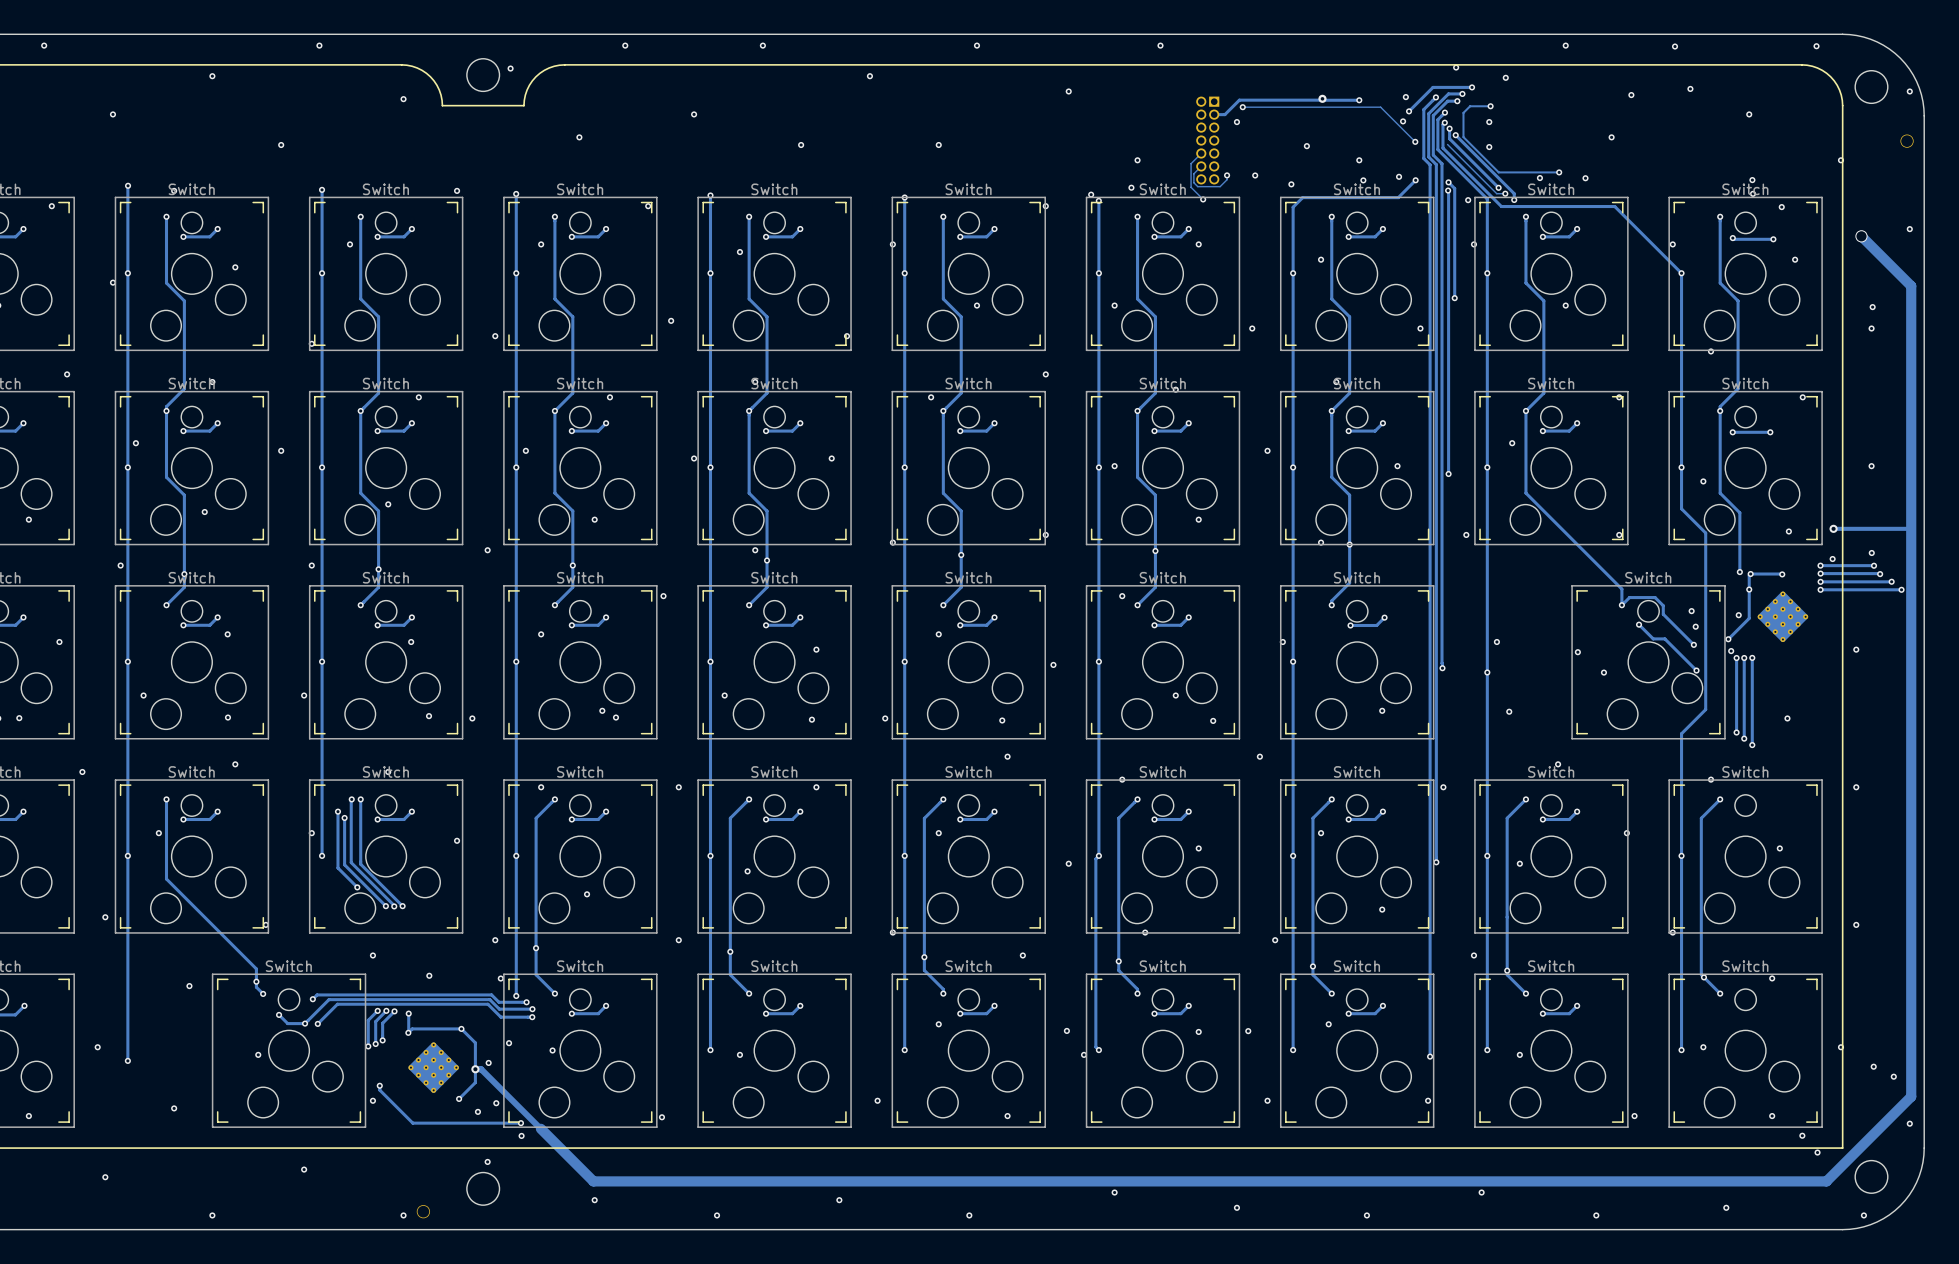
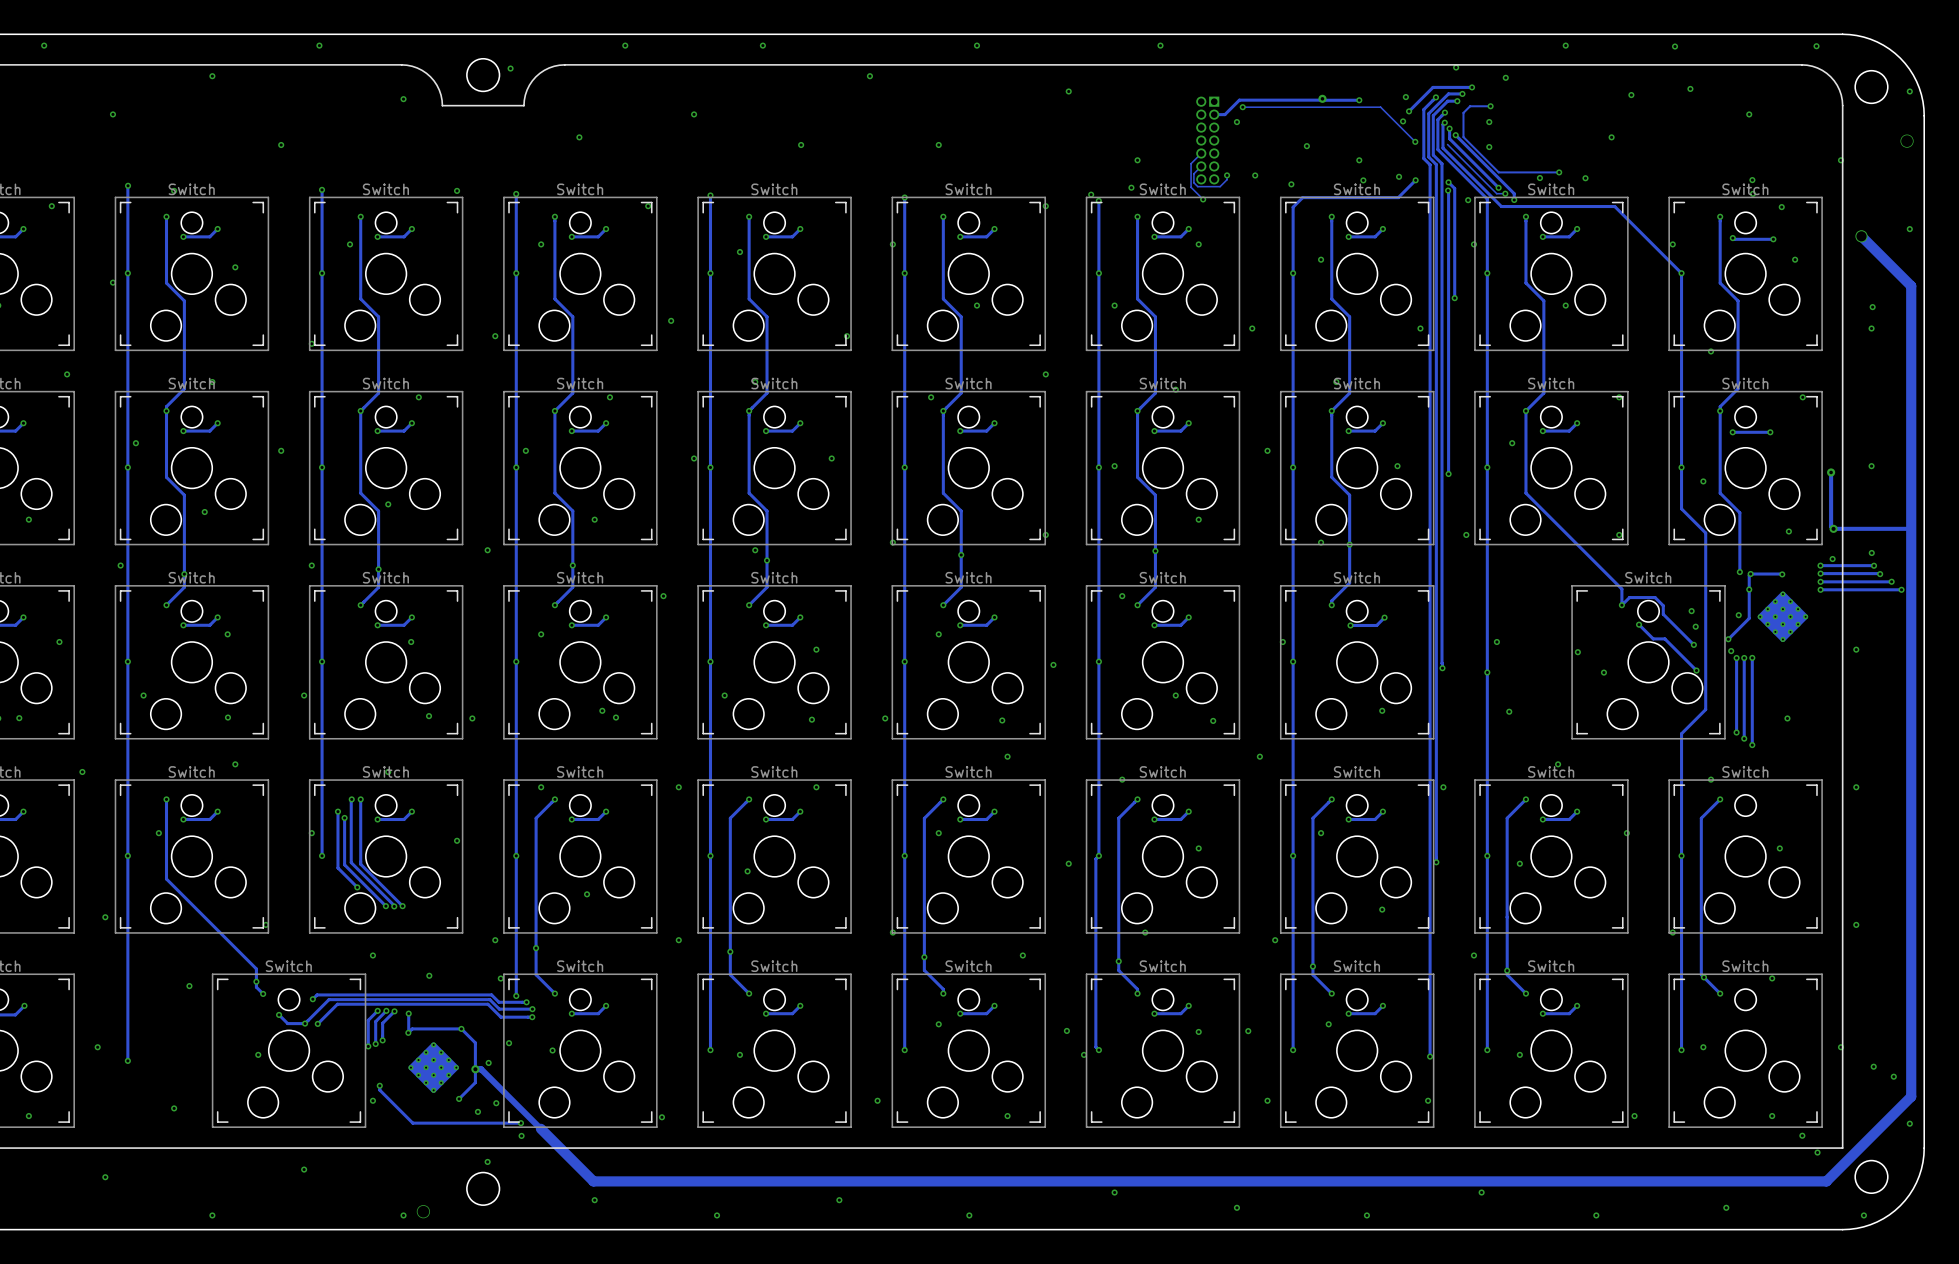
track: none -> (1831, 472) (1831, 526) (1833, 528)
via: none -> (1831, 472)

